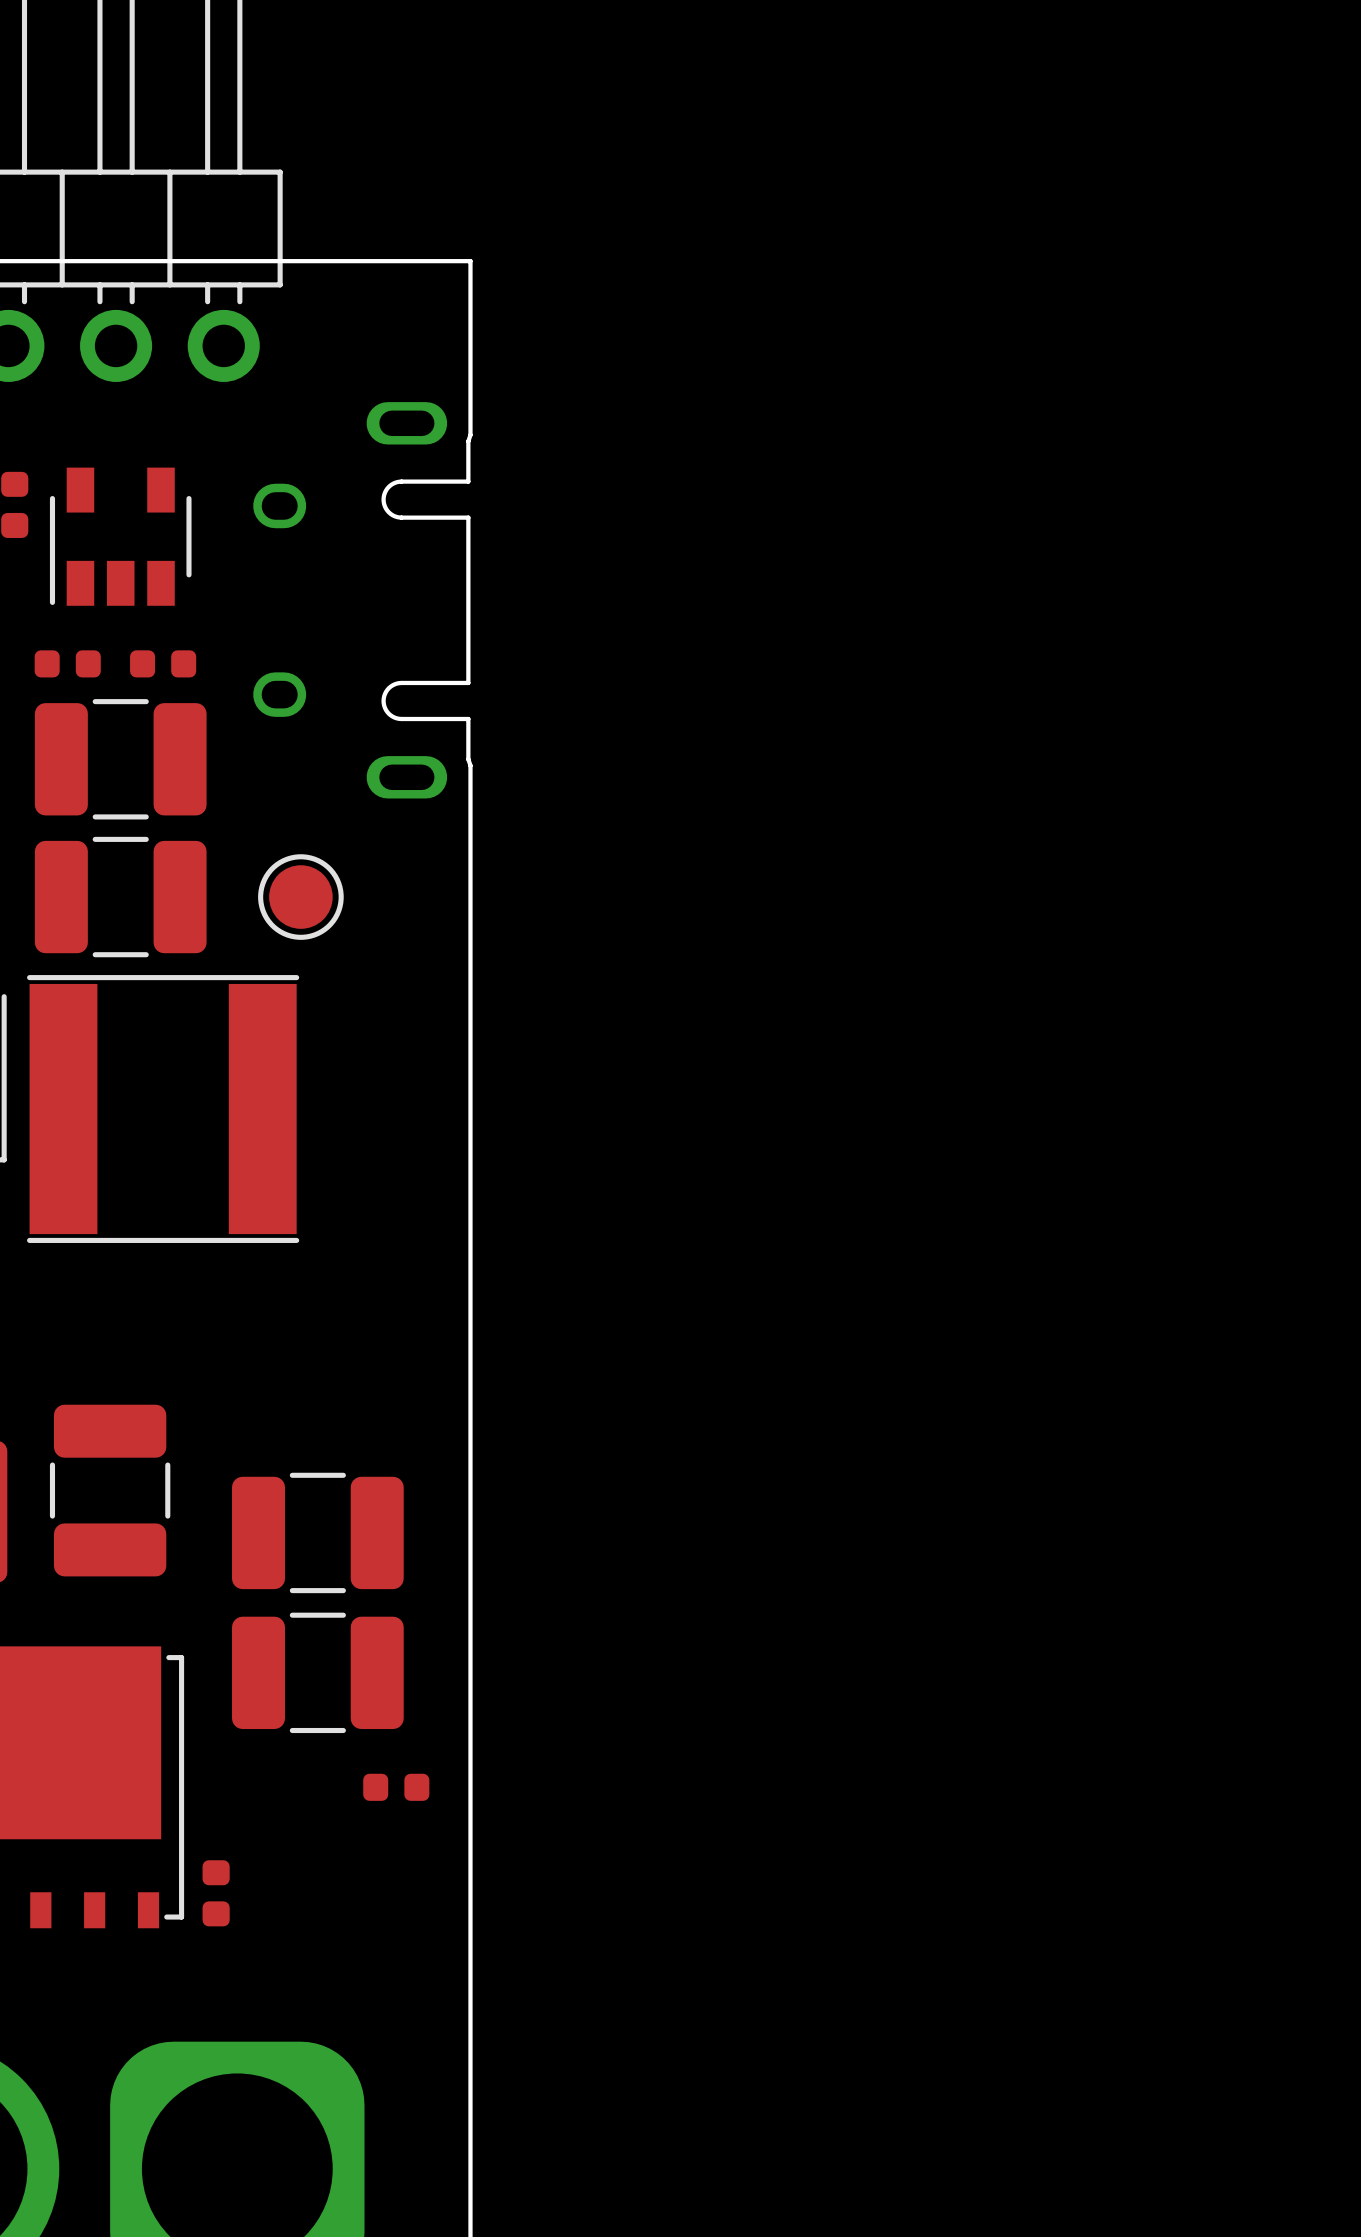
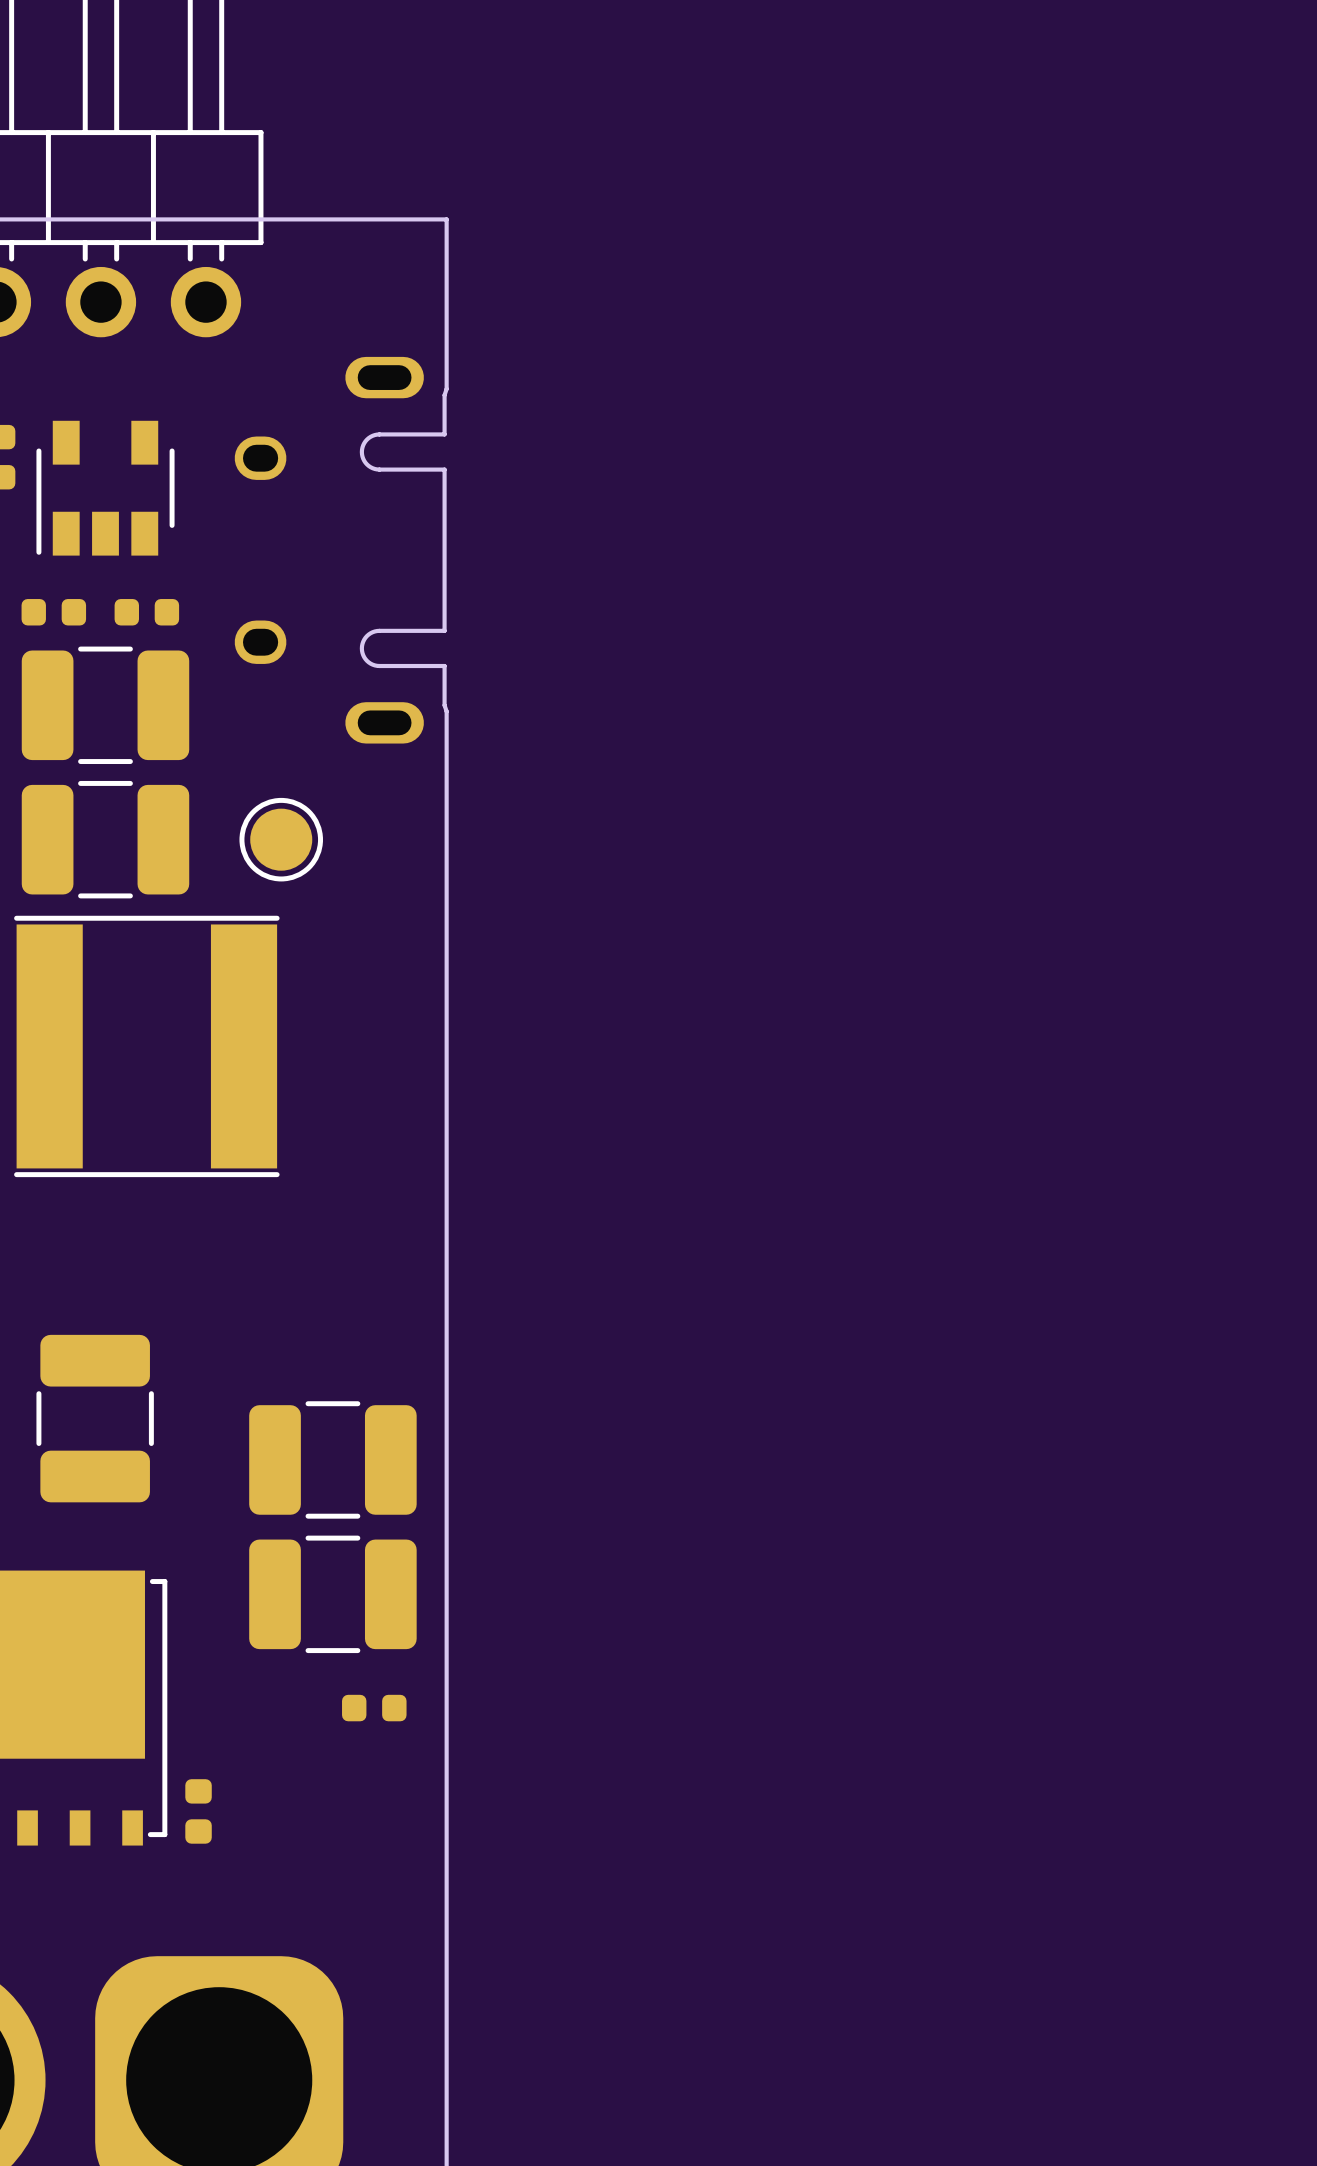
part position: (317, 1532) -> (332, 1459)
part position: (317, 1672) -> (332, 1594)

